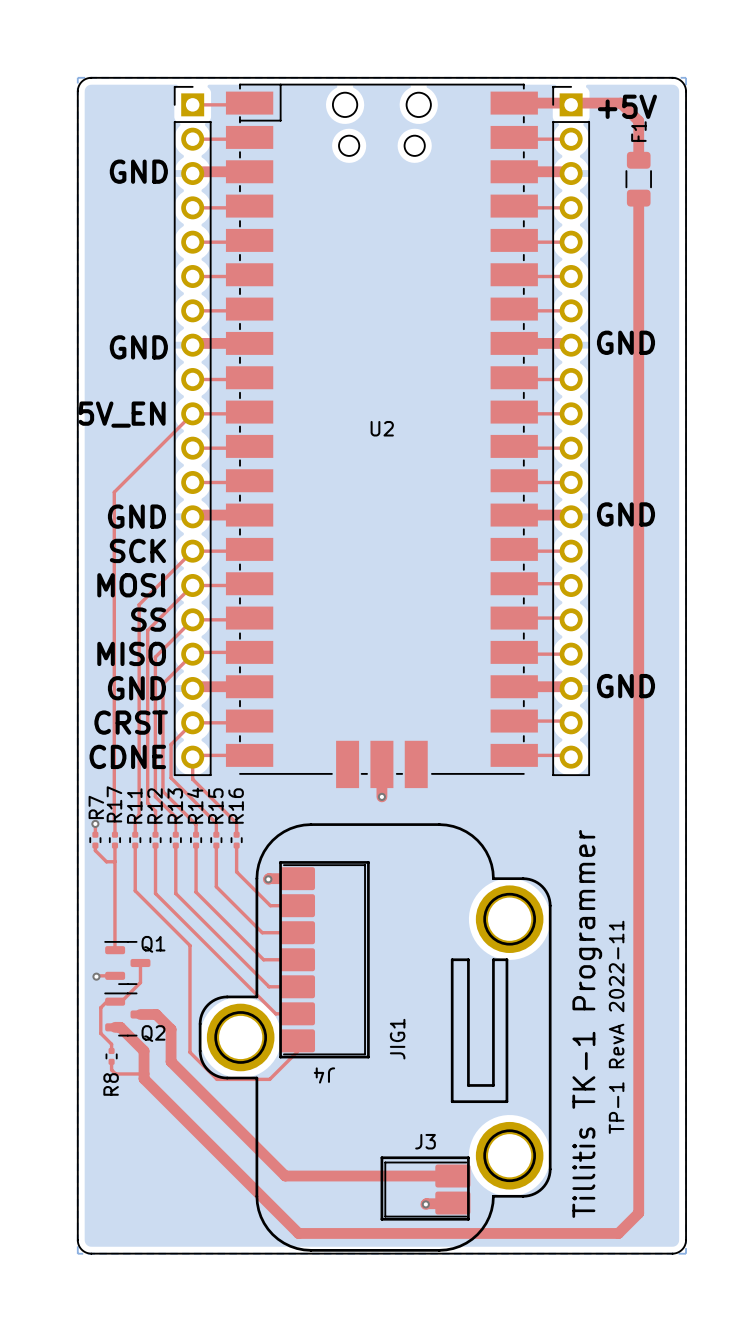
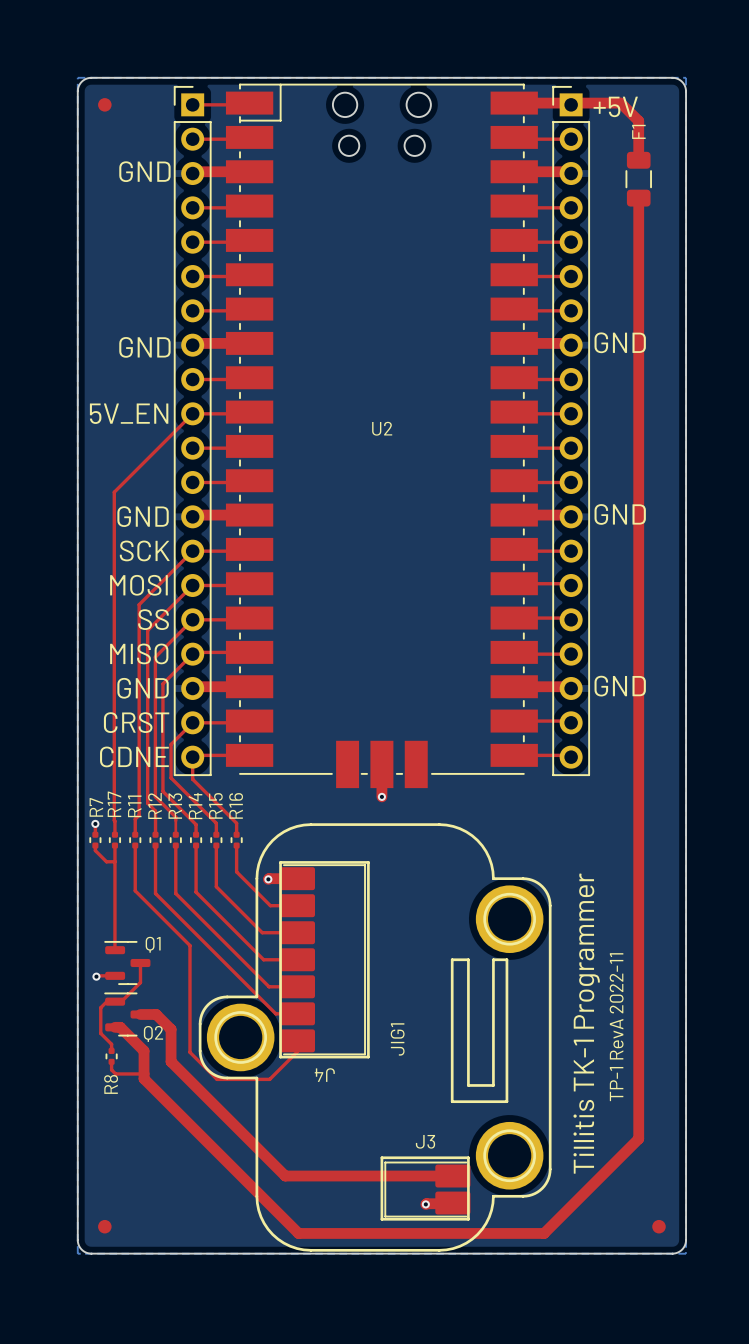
part: none -> (104, 104)
top track: (638, 1138) (638, 1213) (618, 1233) (544, 1233) -> (638, 1138) (544, 1233)
part: none -> (104, 1226)
part: none -> (659, 1226)

